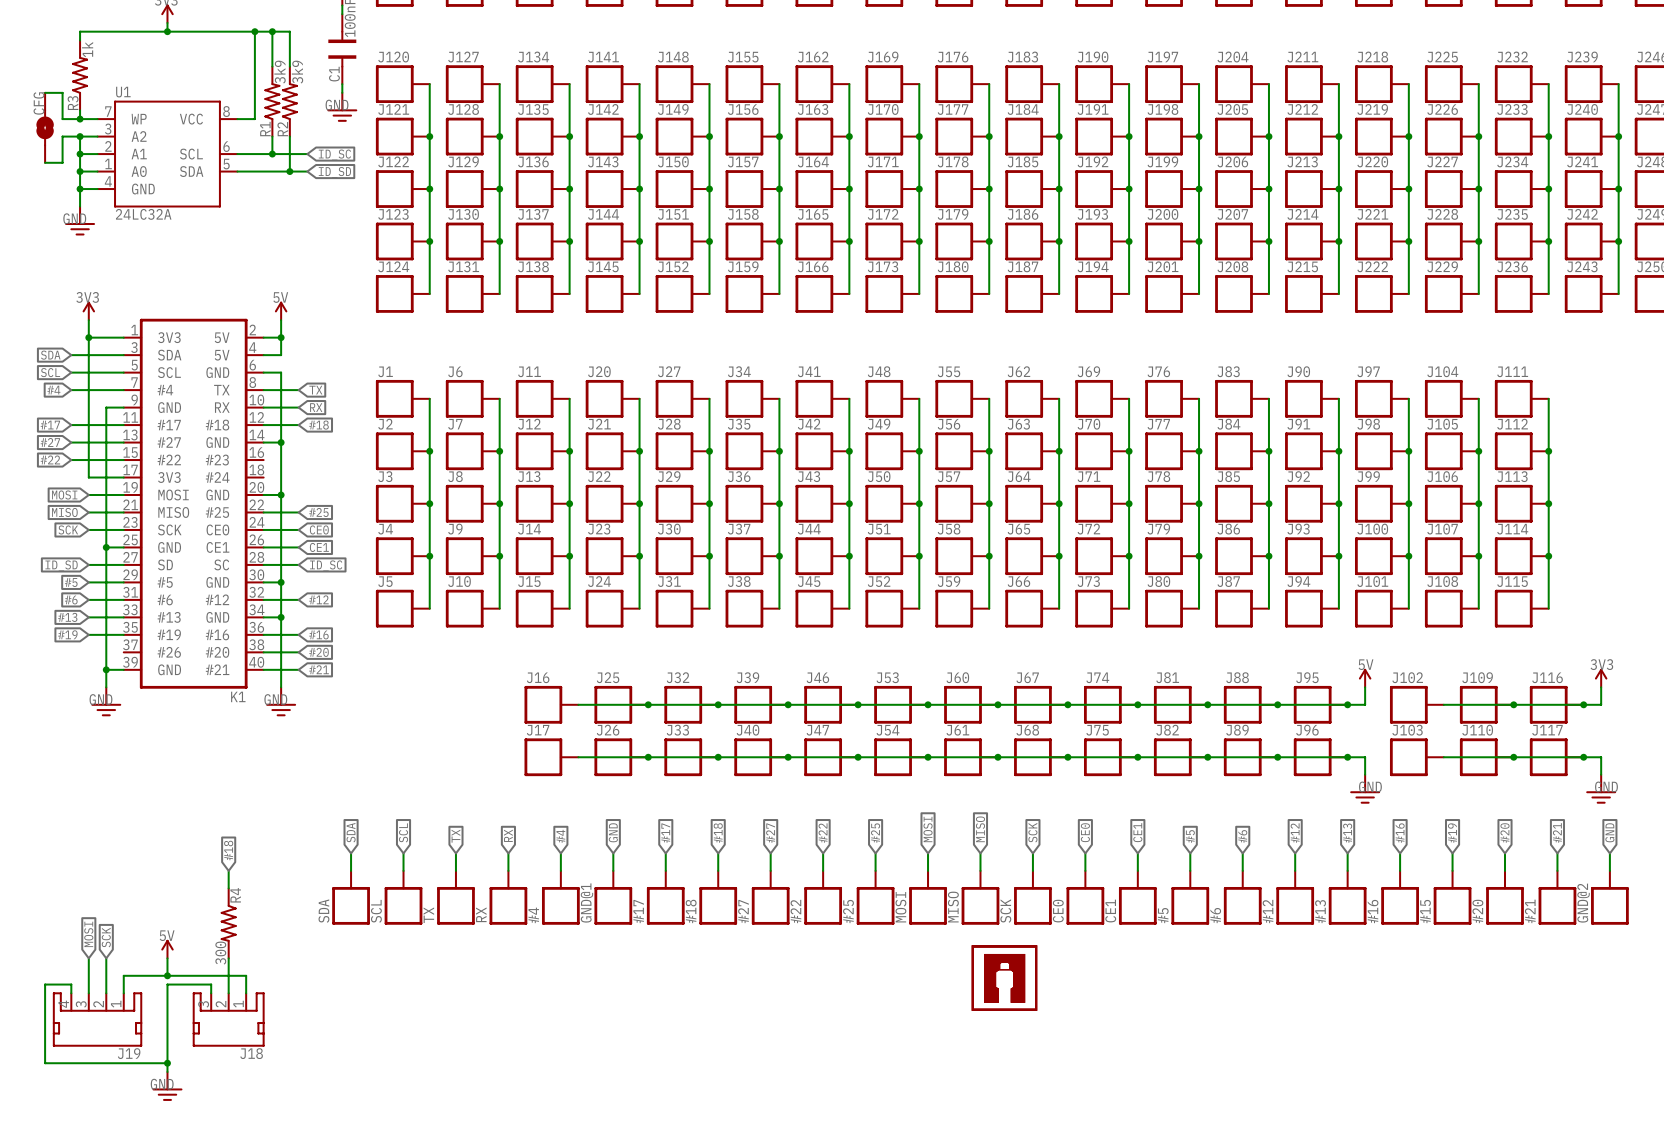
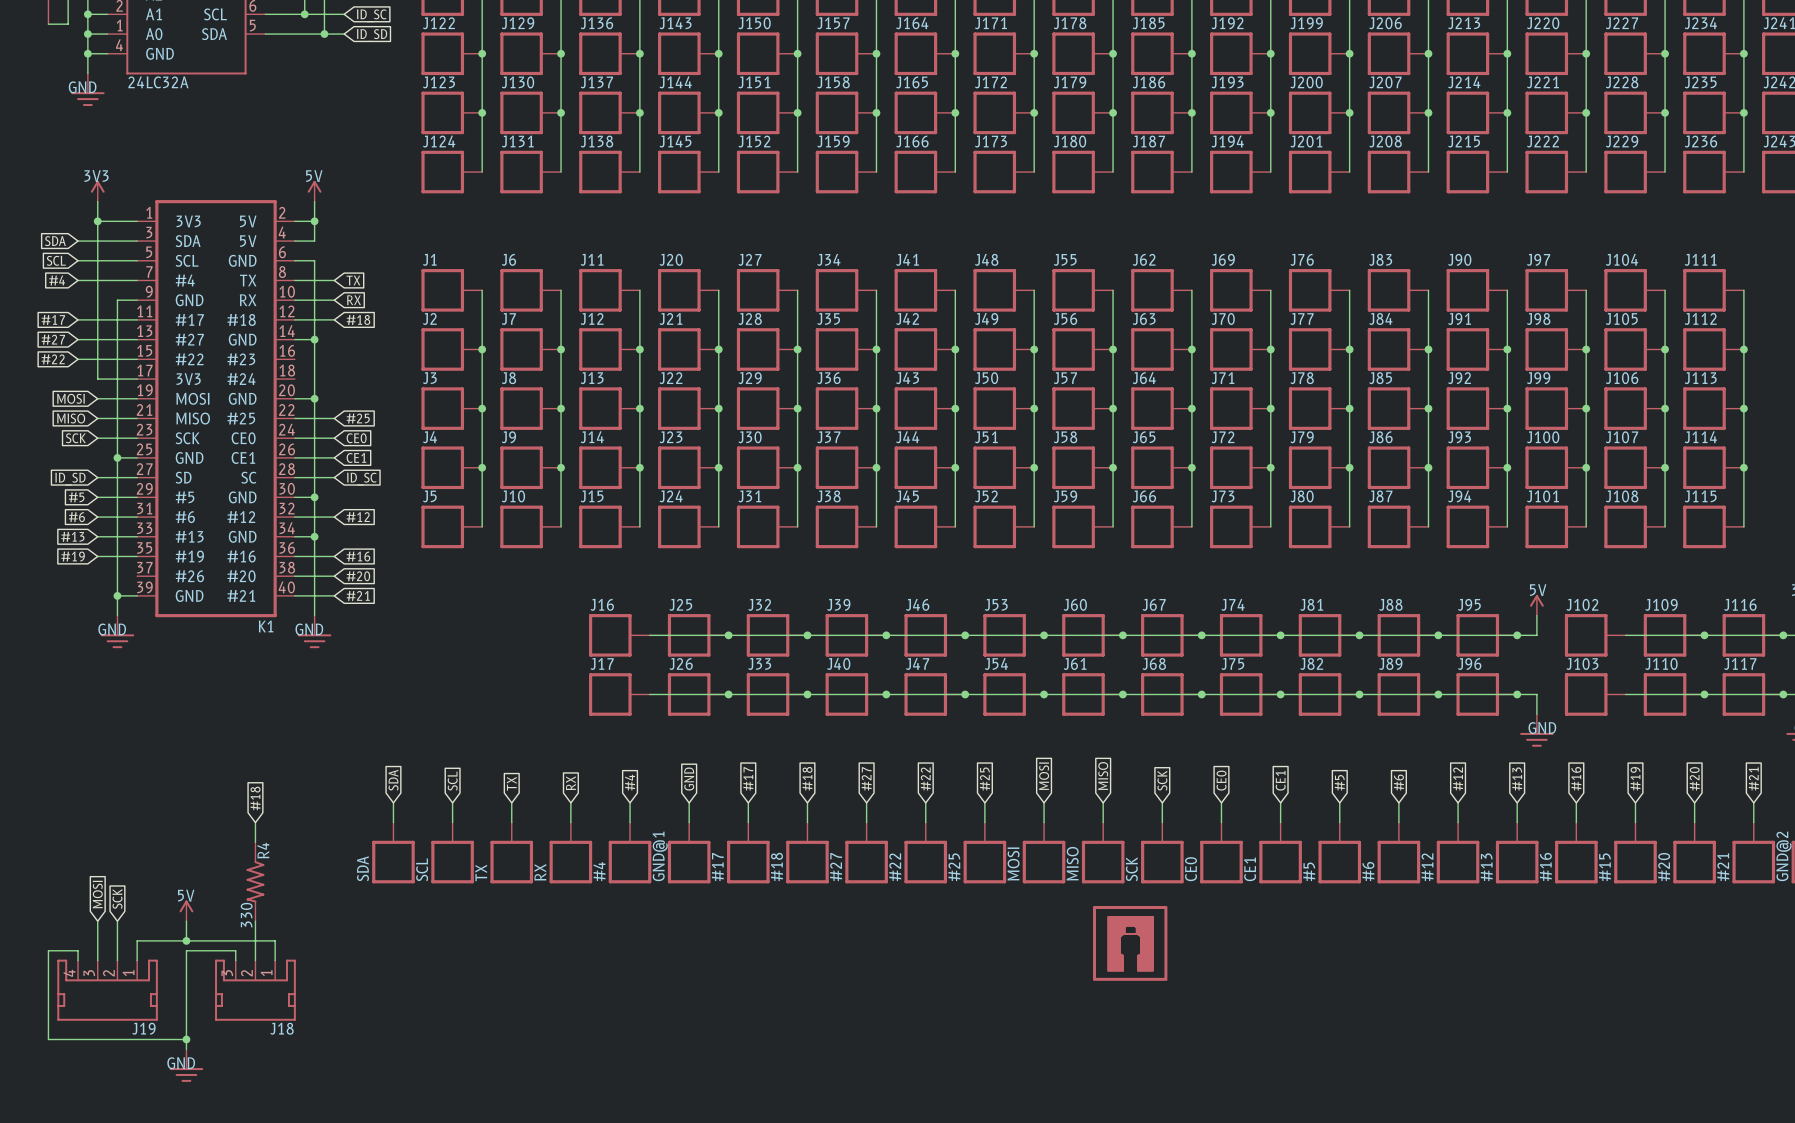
R4 value: 300 (220, 953) -> 330 (246, 915)

